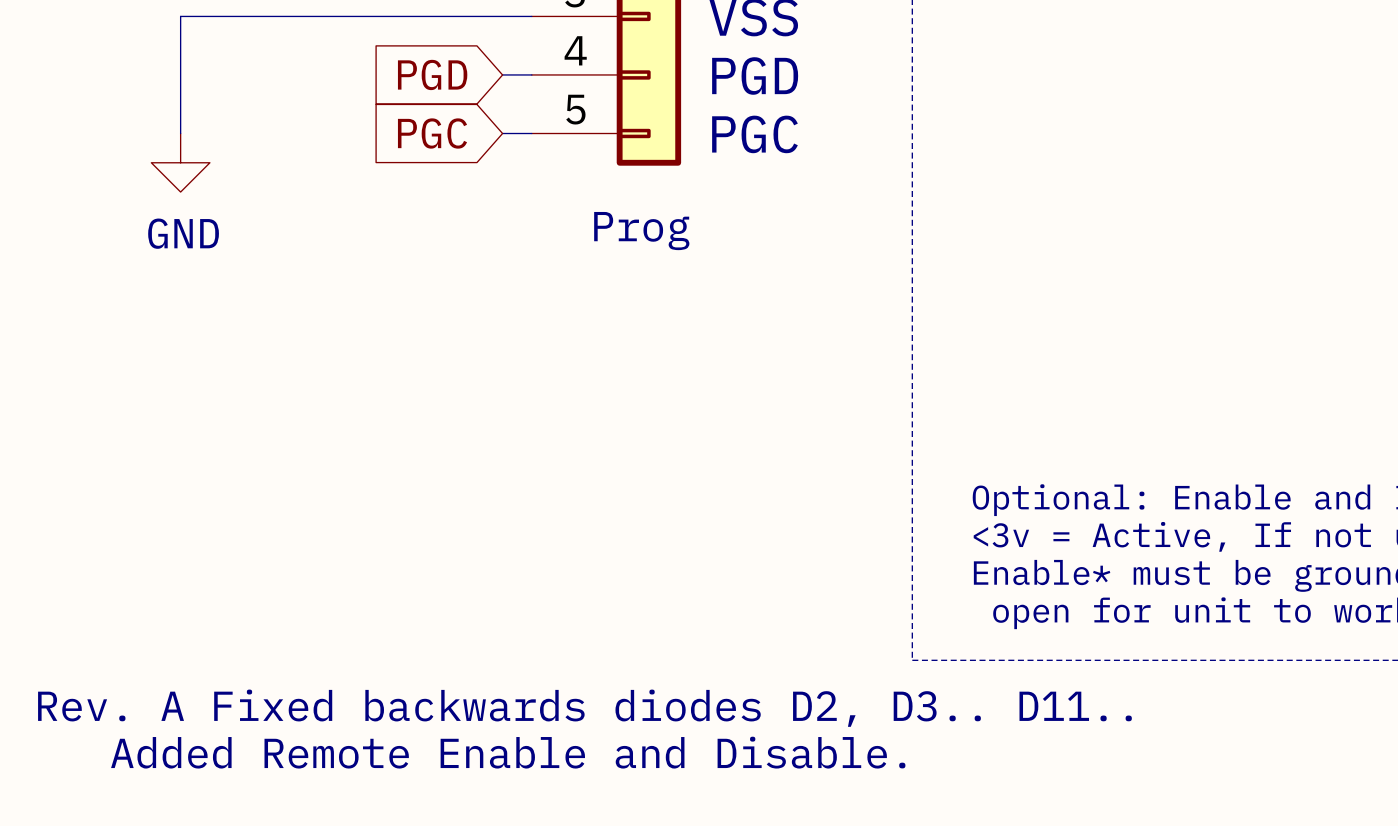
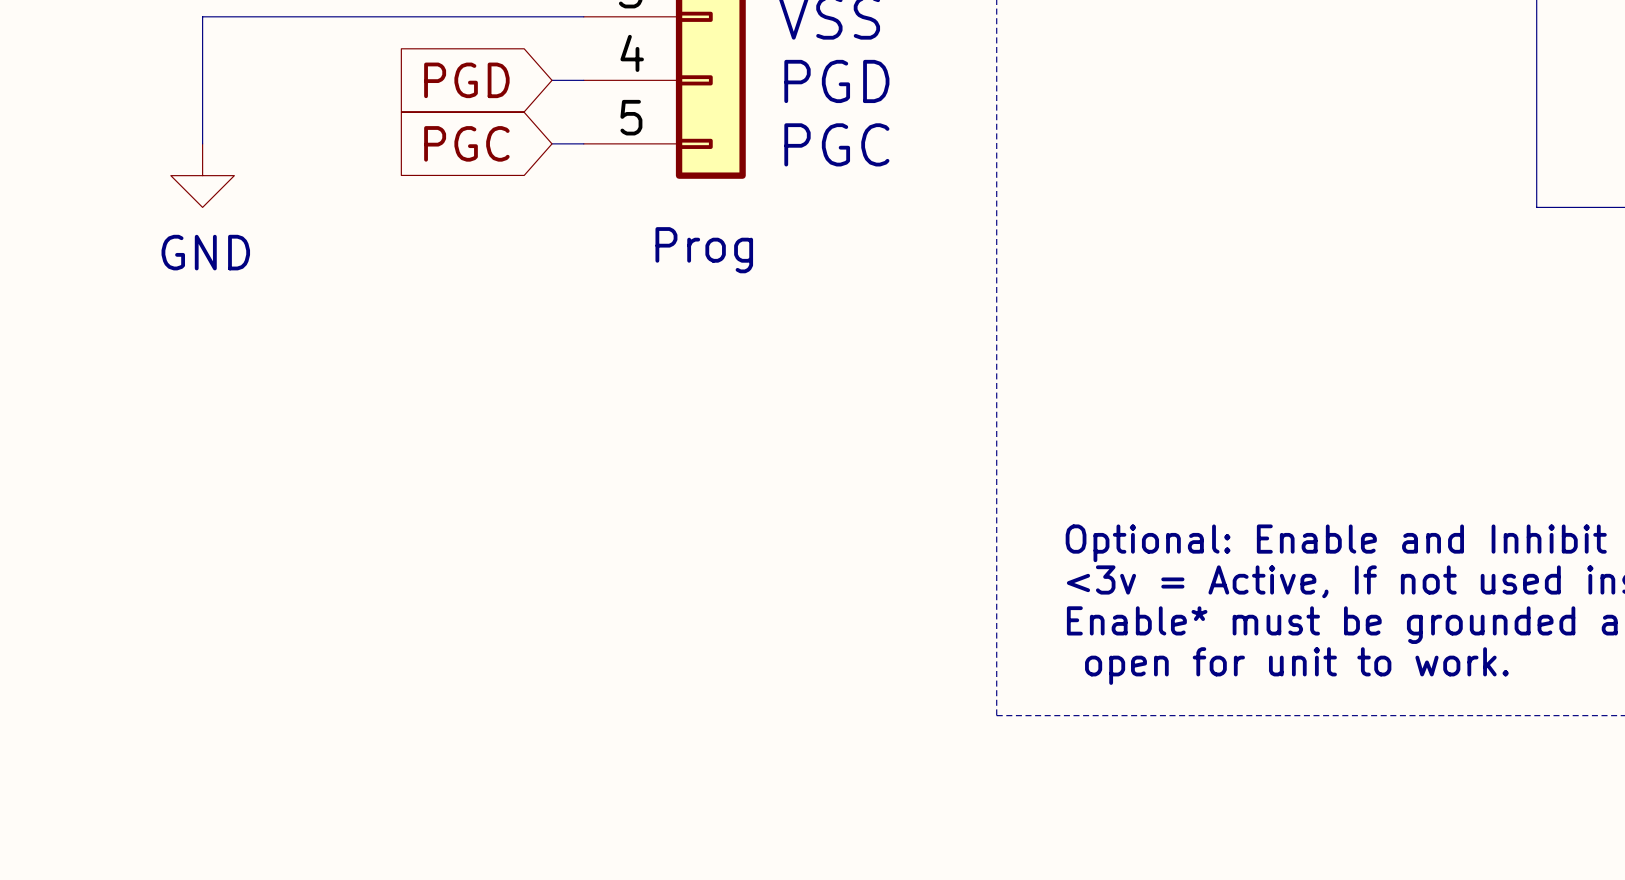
text: Rev. A Fixed backwards diodes D2, D3.. D11.. (584, 708) -> none
text: Added Remote Enable and Disable. (508, 752) -> none

